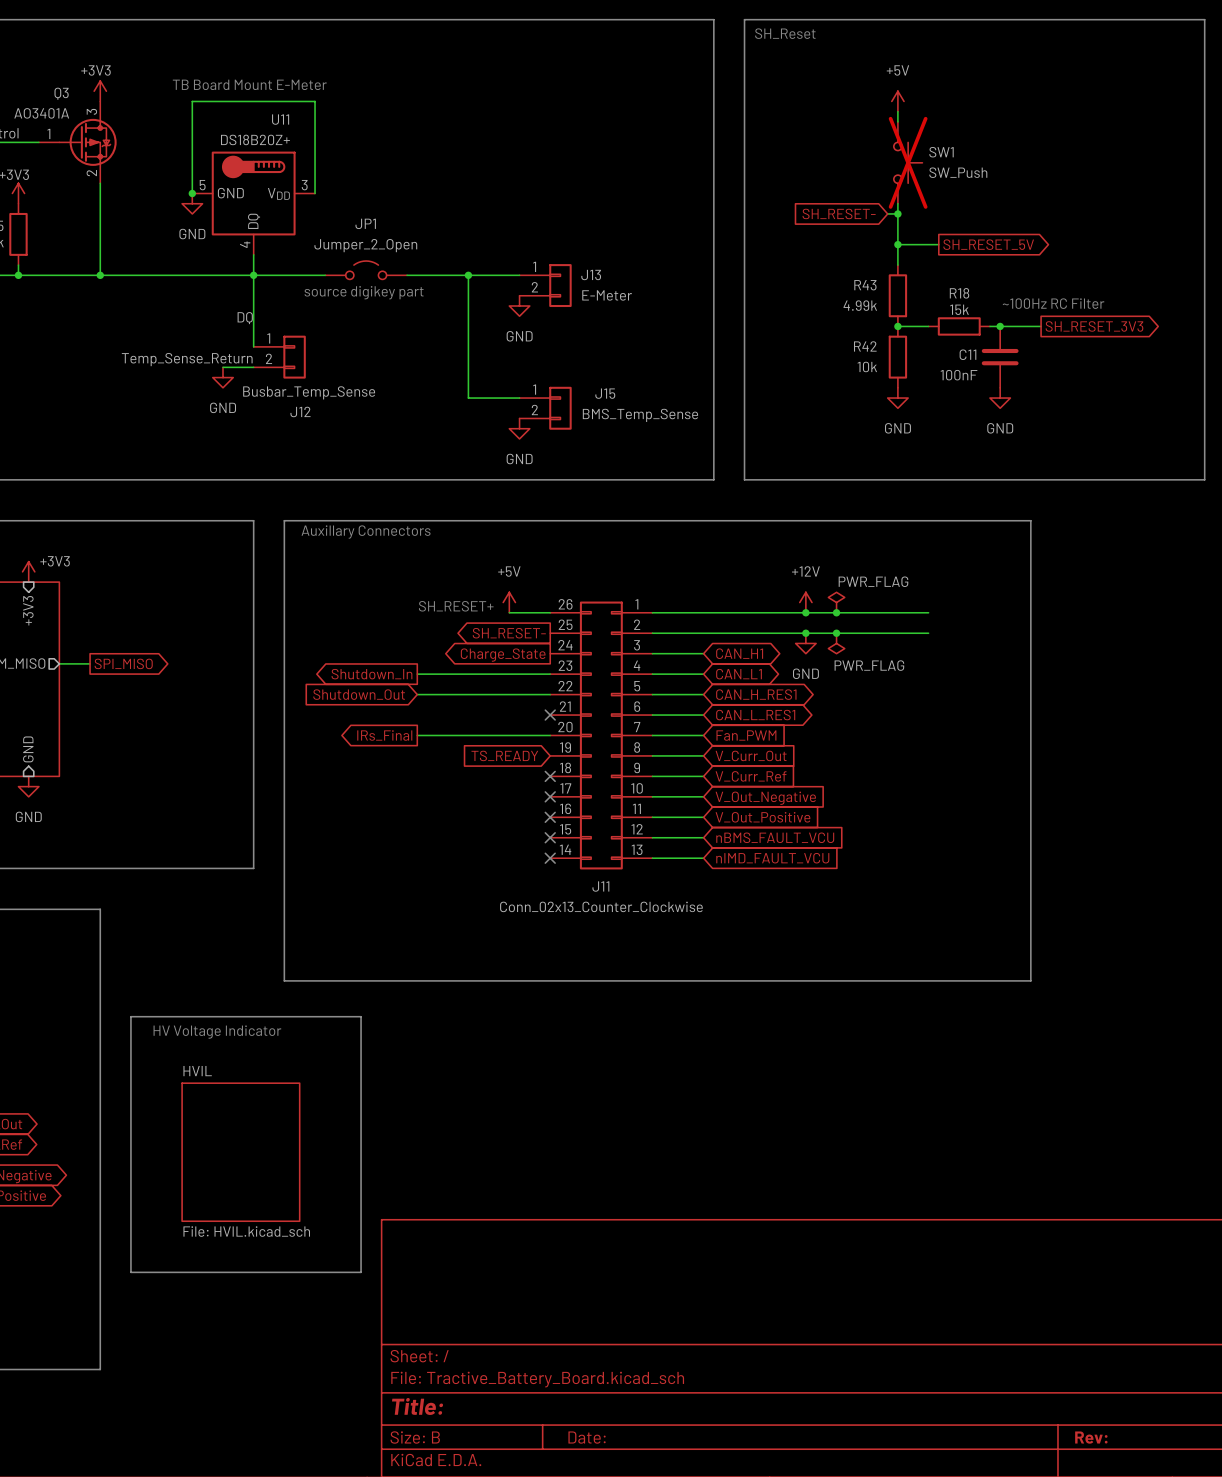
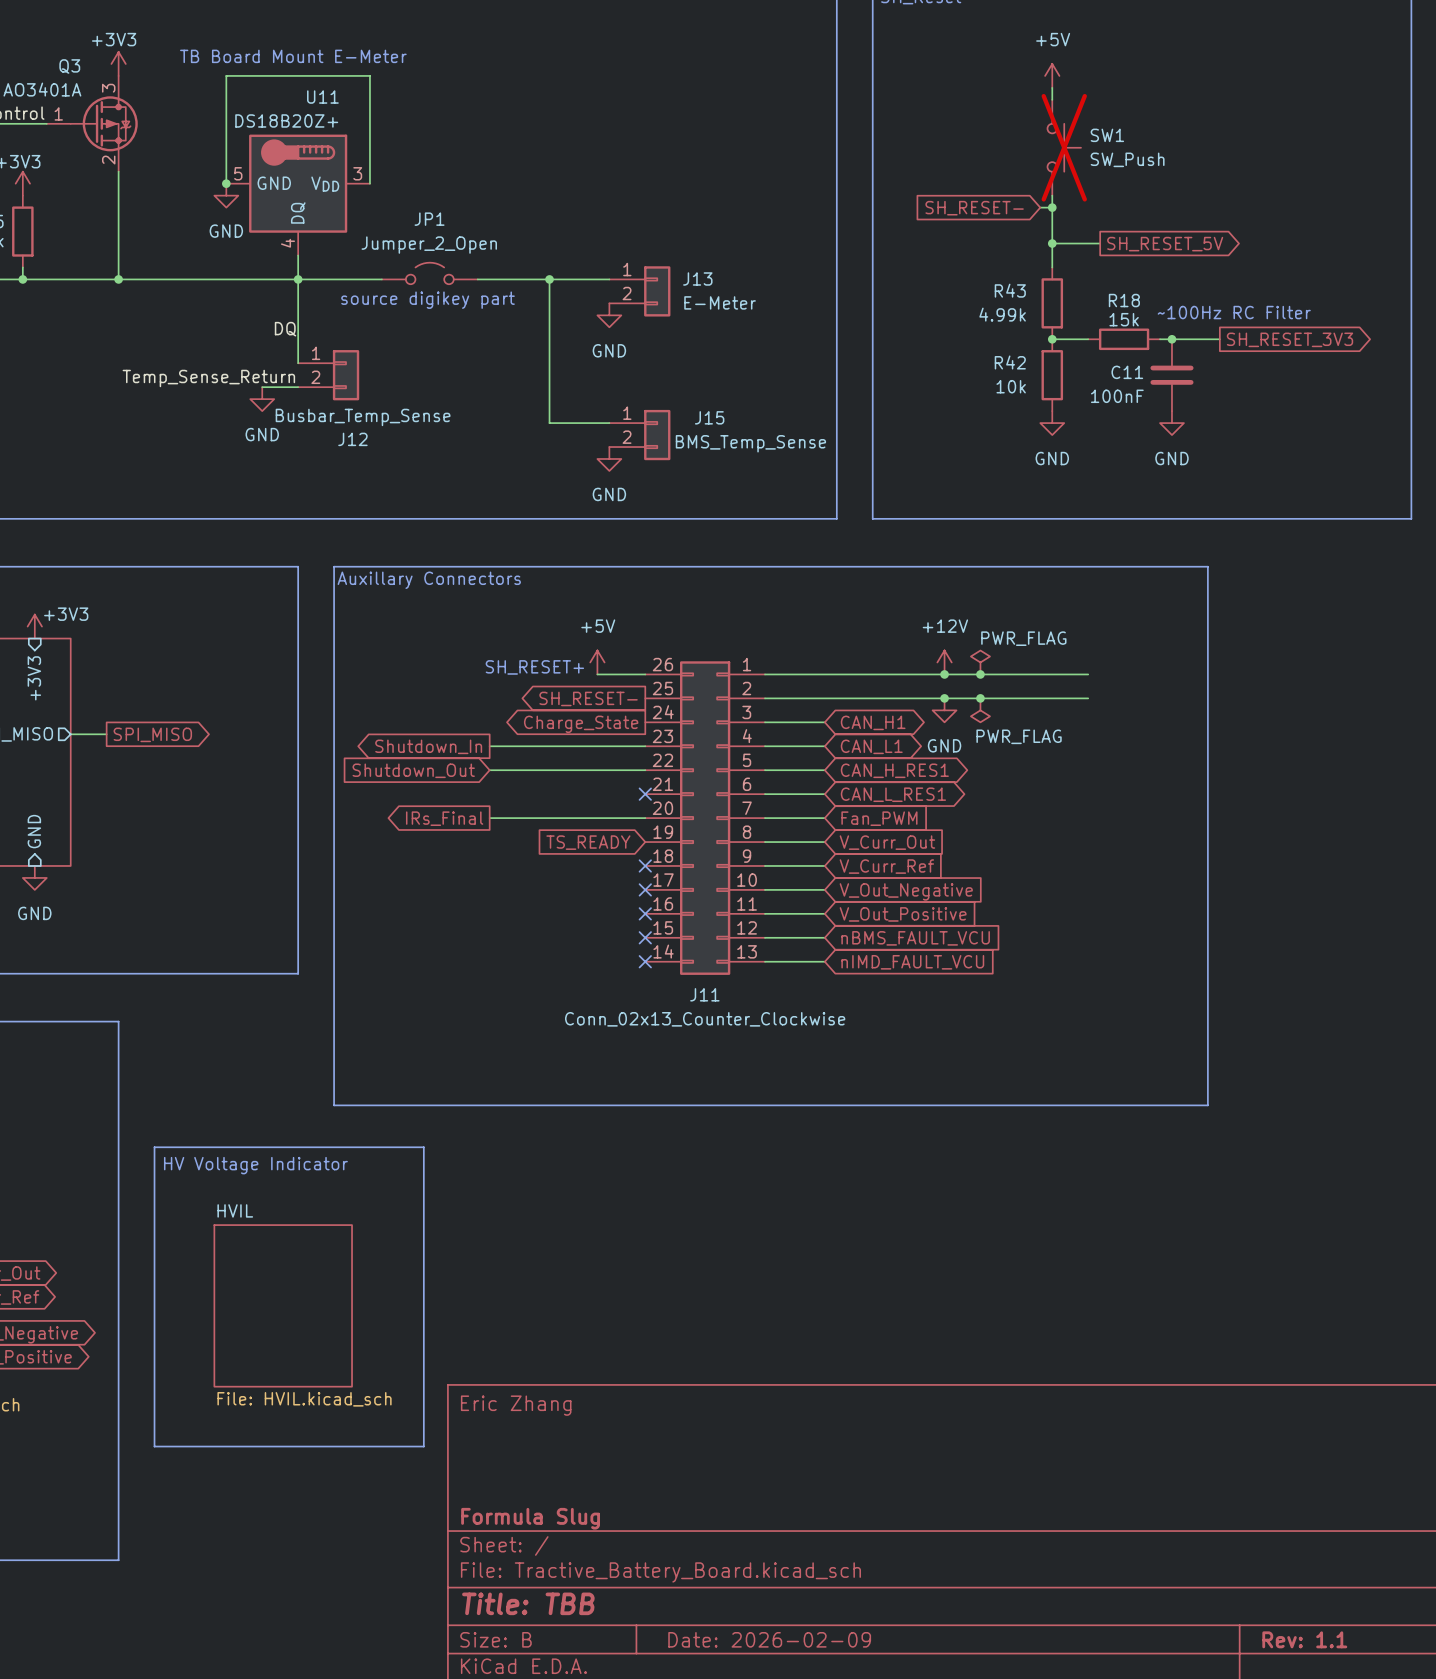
title block: none -> Eric Zhang (516, 1405)
title block: none -> Formula Slug (530, 1518)
title block: Title: (417, 1406) -> Title: TBB (528, 1603)
title block: Date: (587, 1437) -> Date: 2026-02-09 (769, 1639)
title block: Rev: (1091, 1437) -> Rev: 1.1 (1304, 1639)

